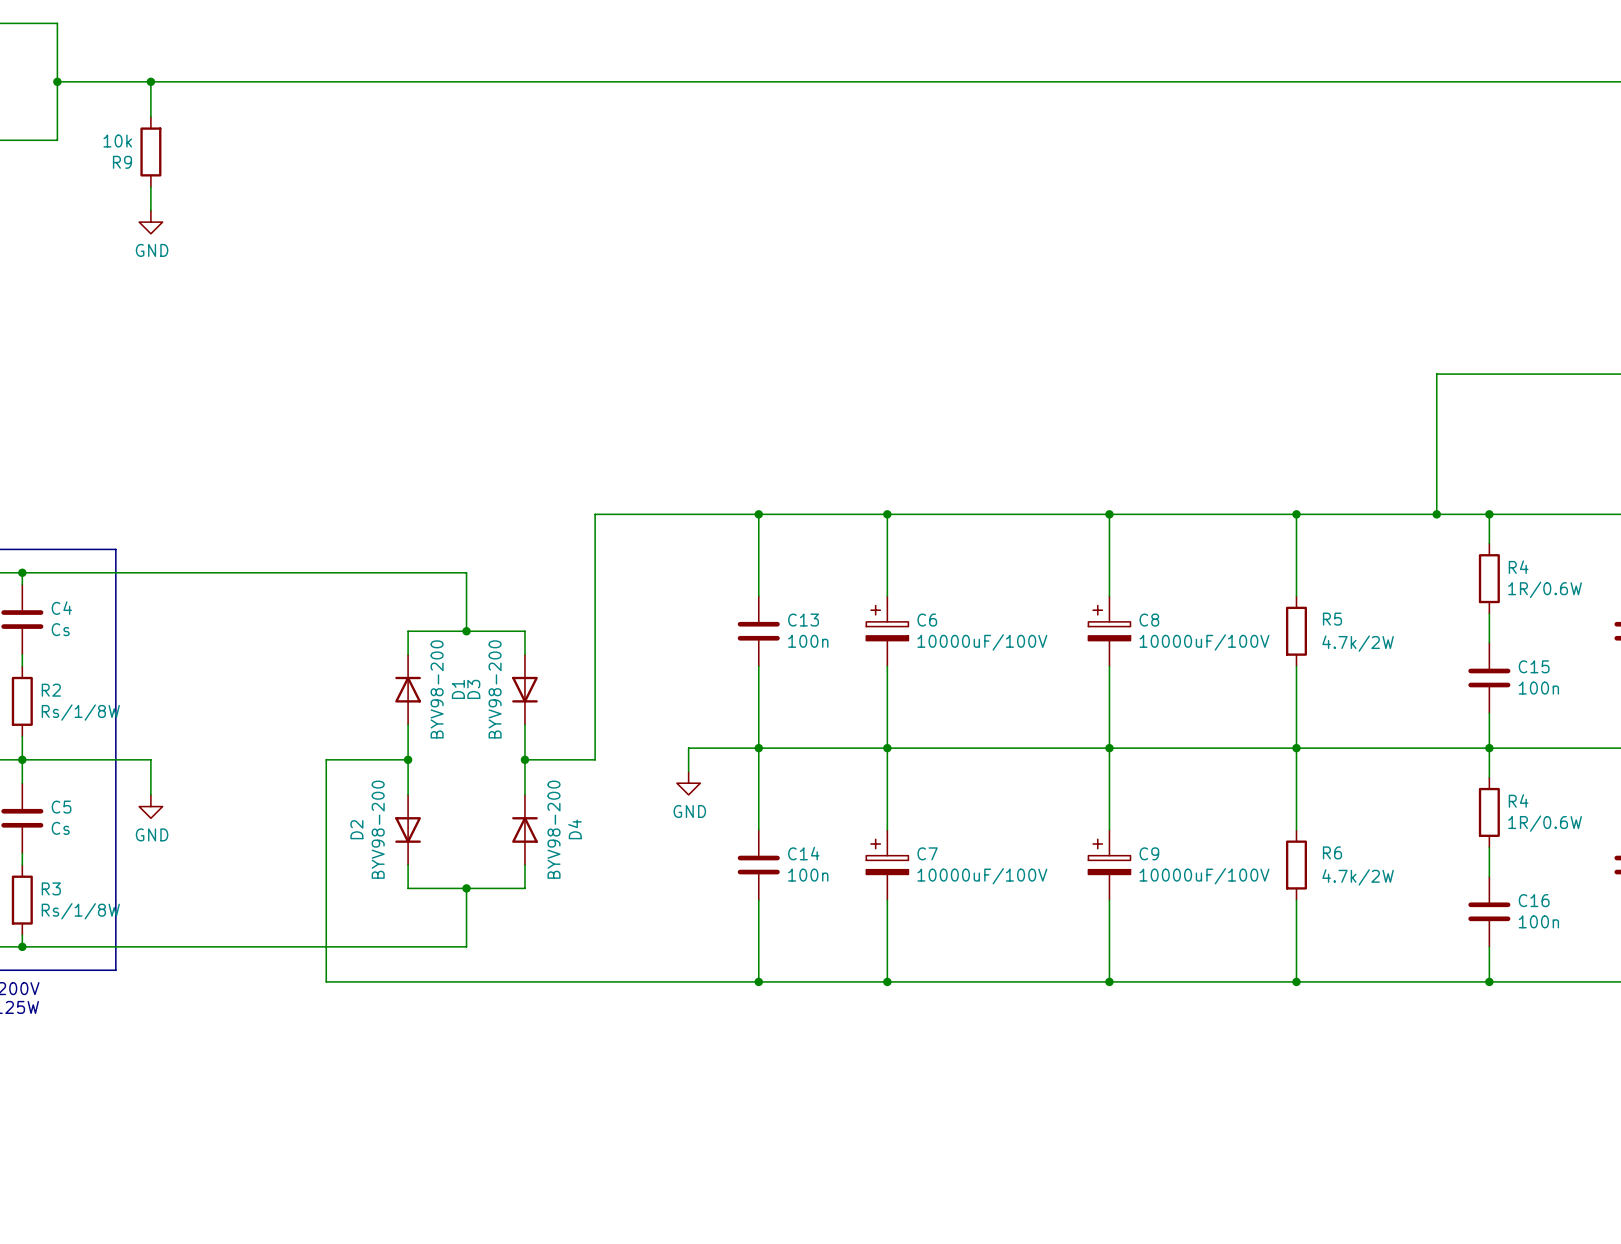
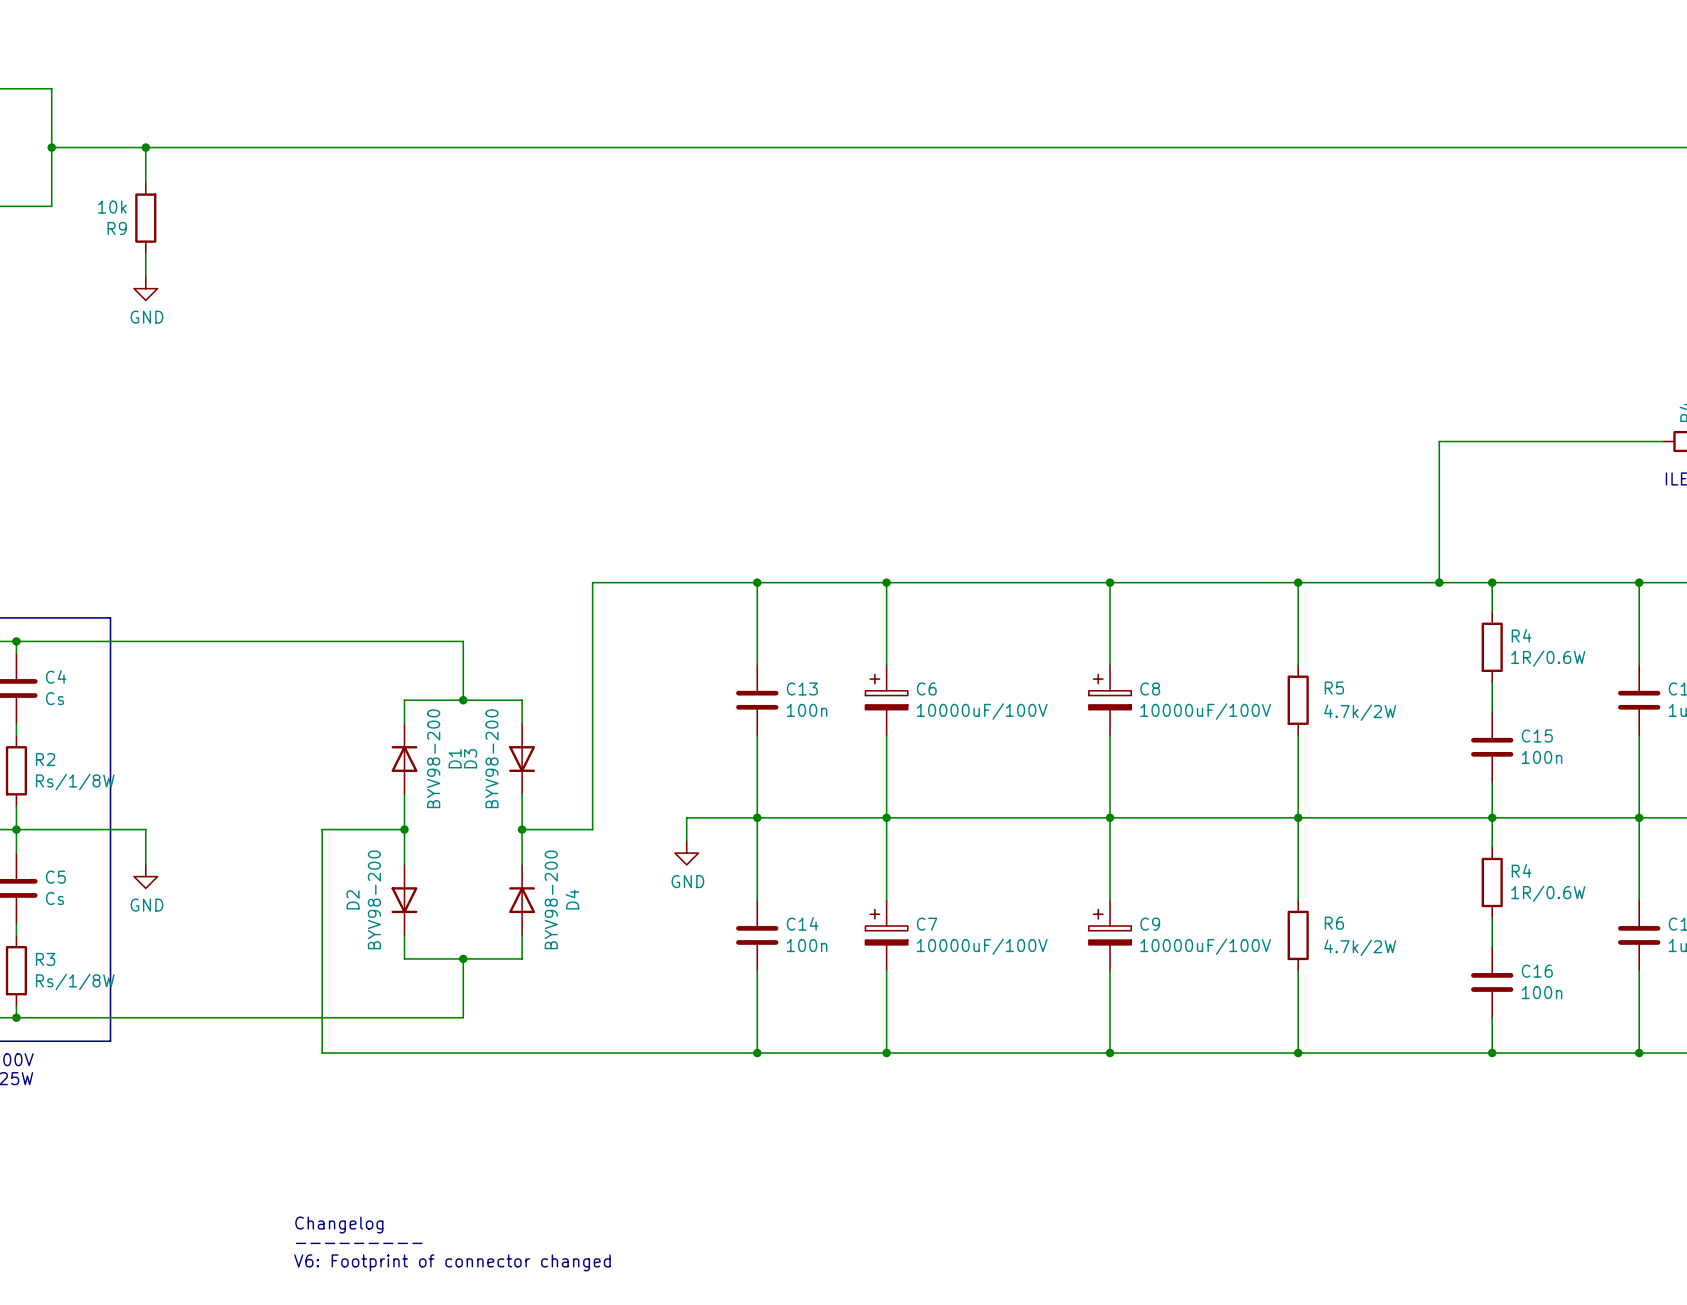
text: none -> Changelog (339, 1225)
text: none -> --------- (359, 1243)
text: none -> V6: Footprint of connector changed (452, 1262)

